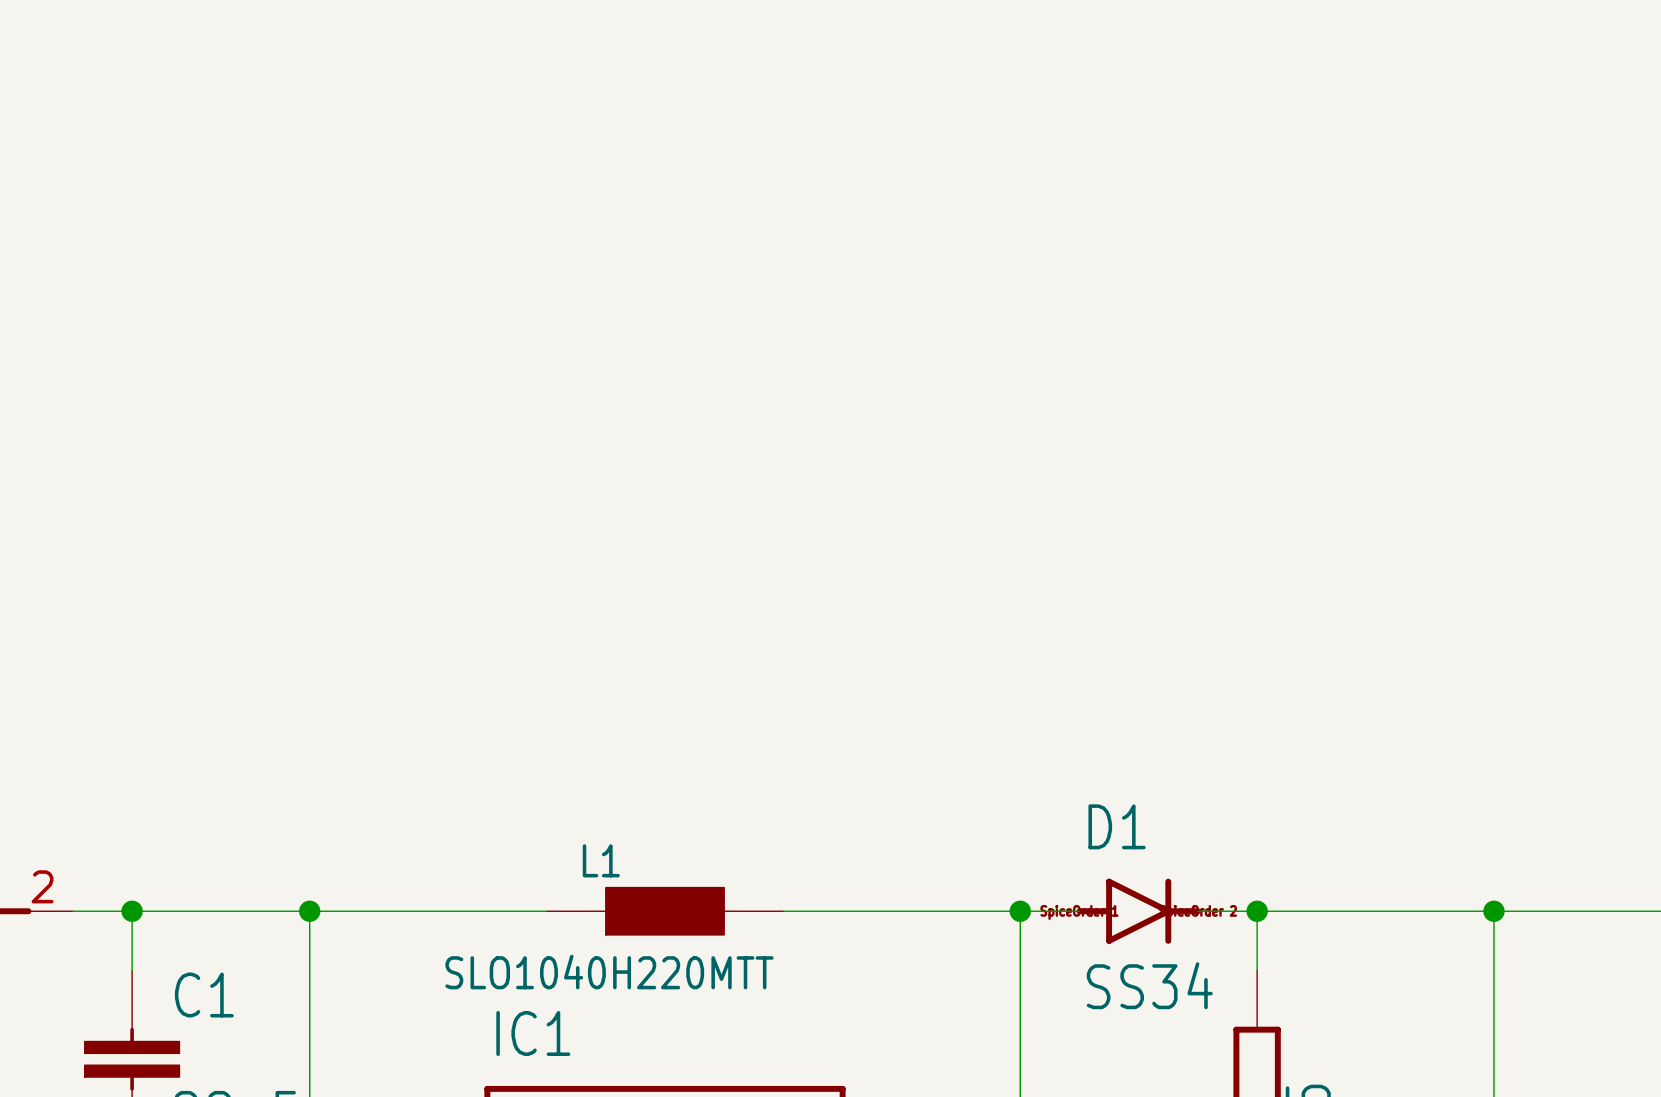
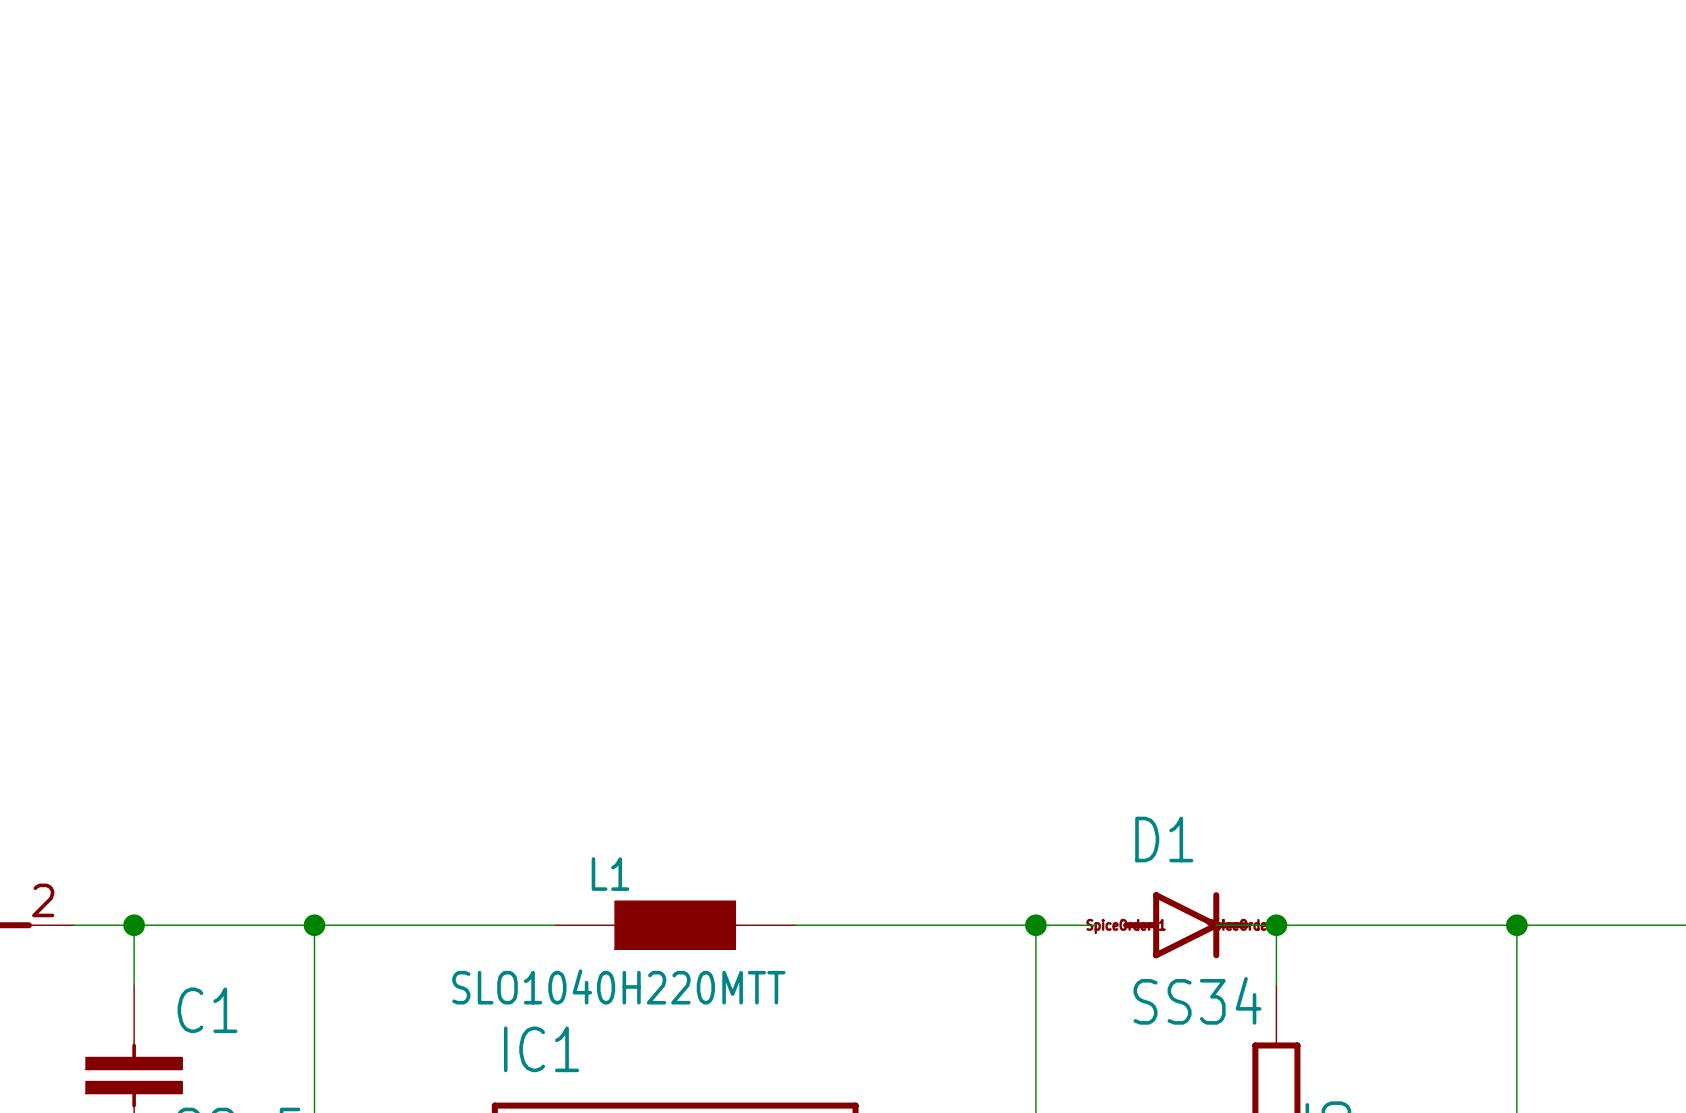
D1 position: (1138, 911) -> (1186, 925)

